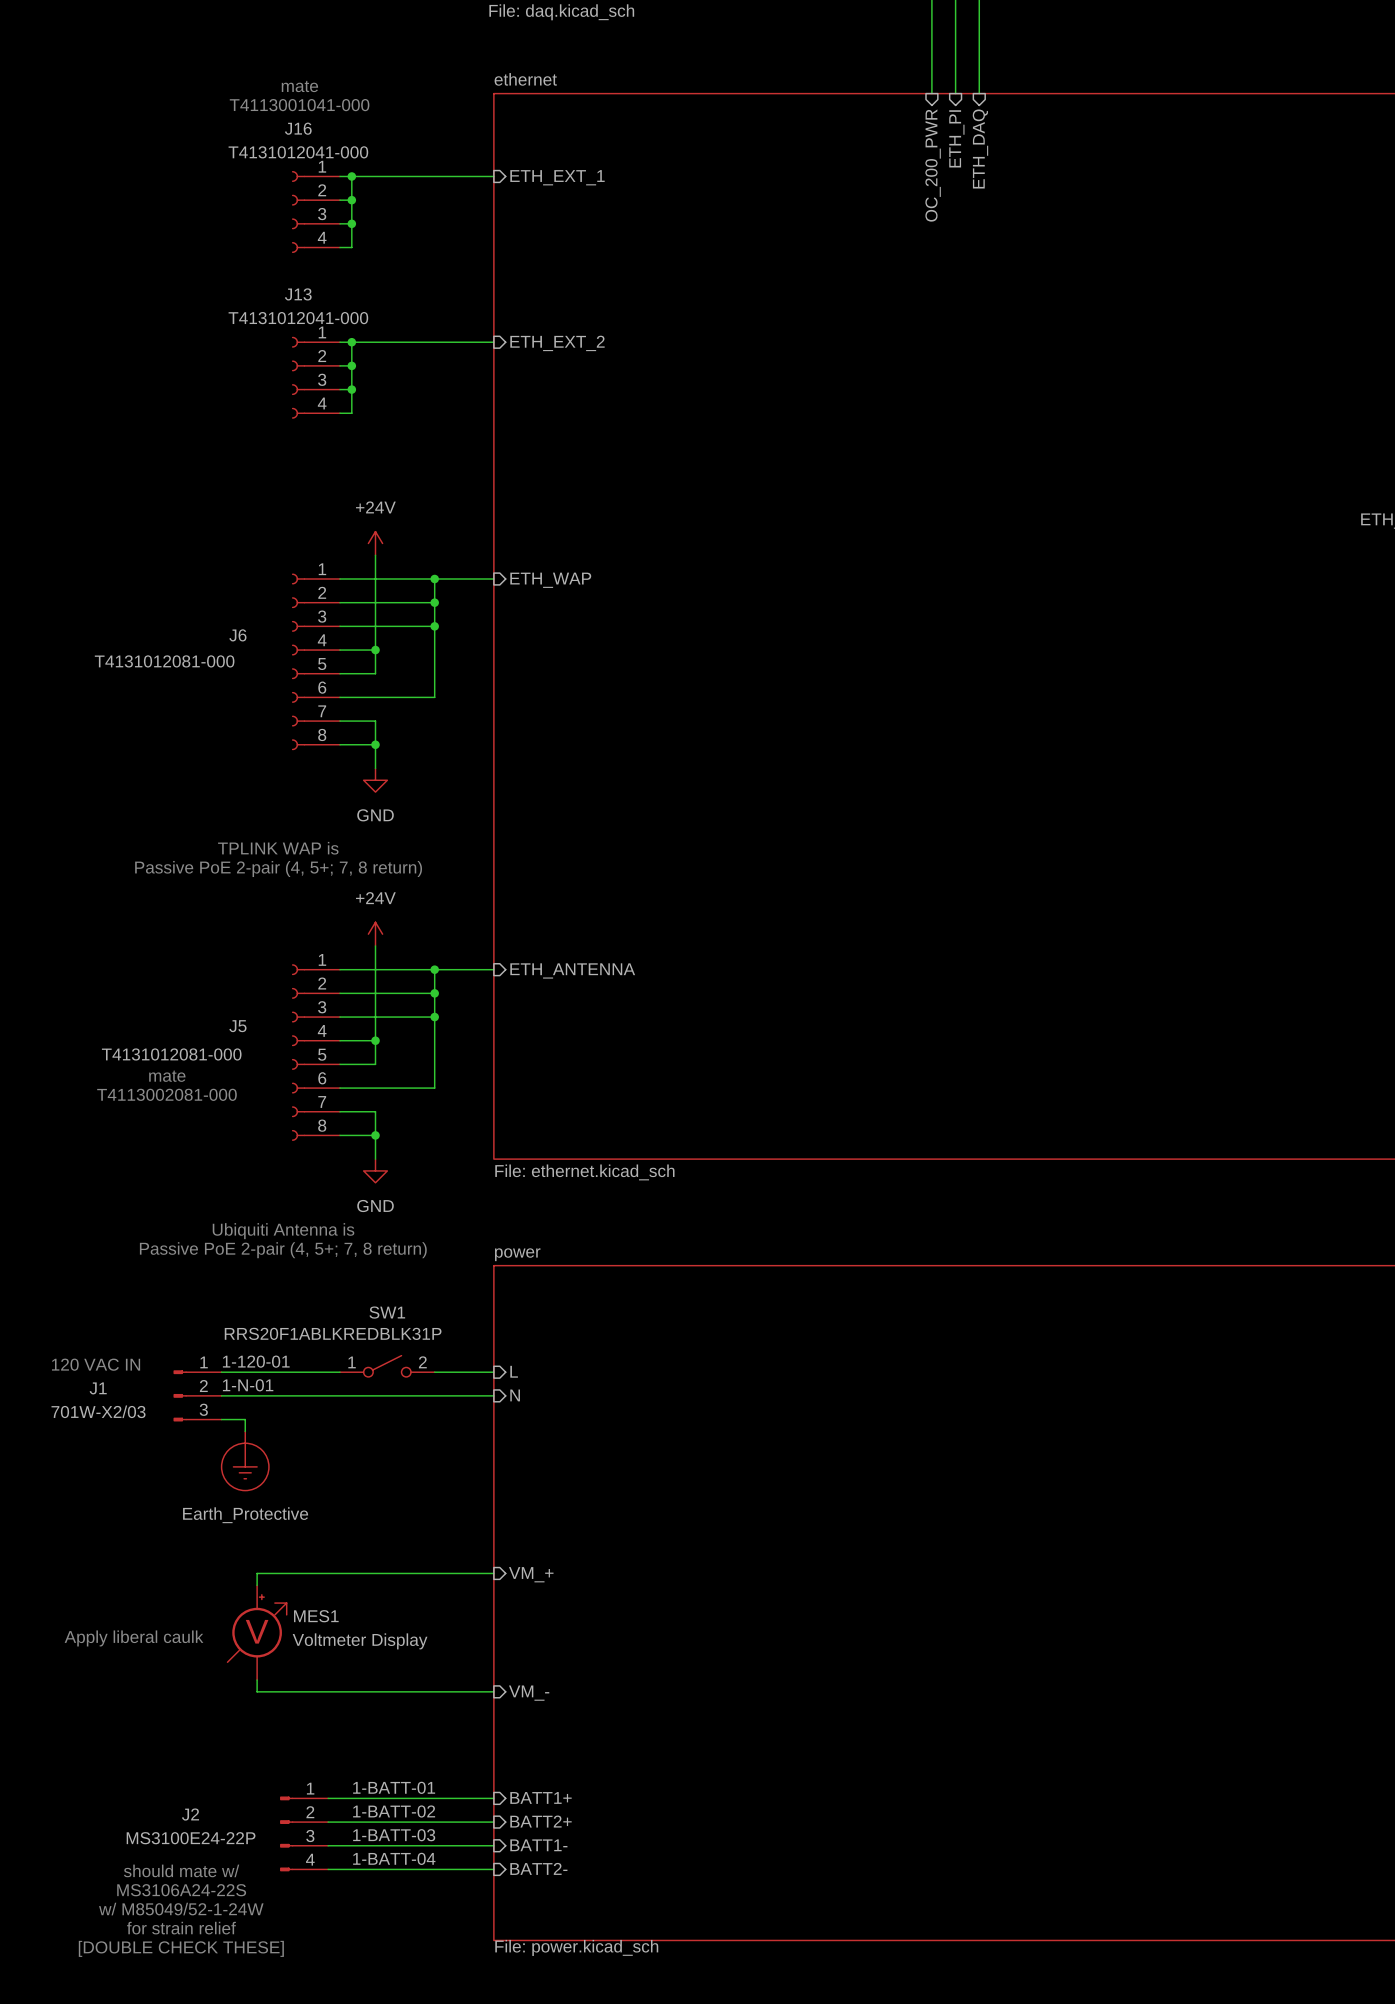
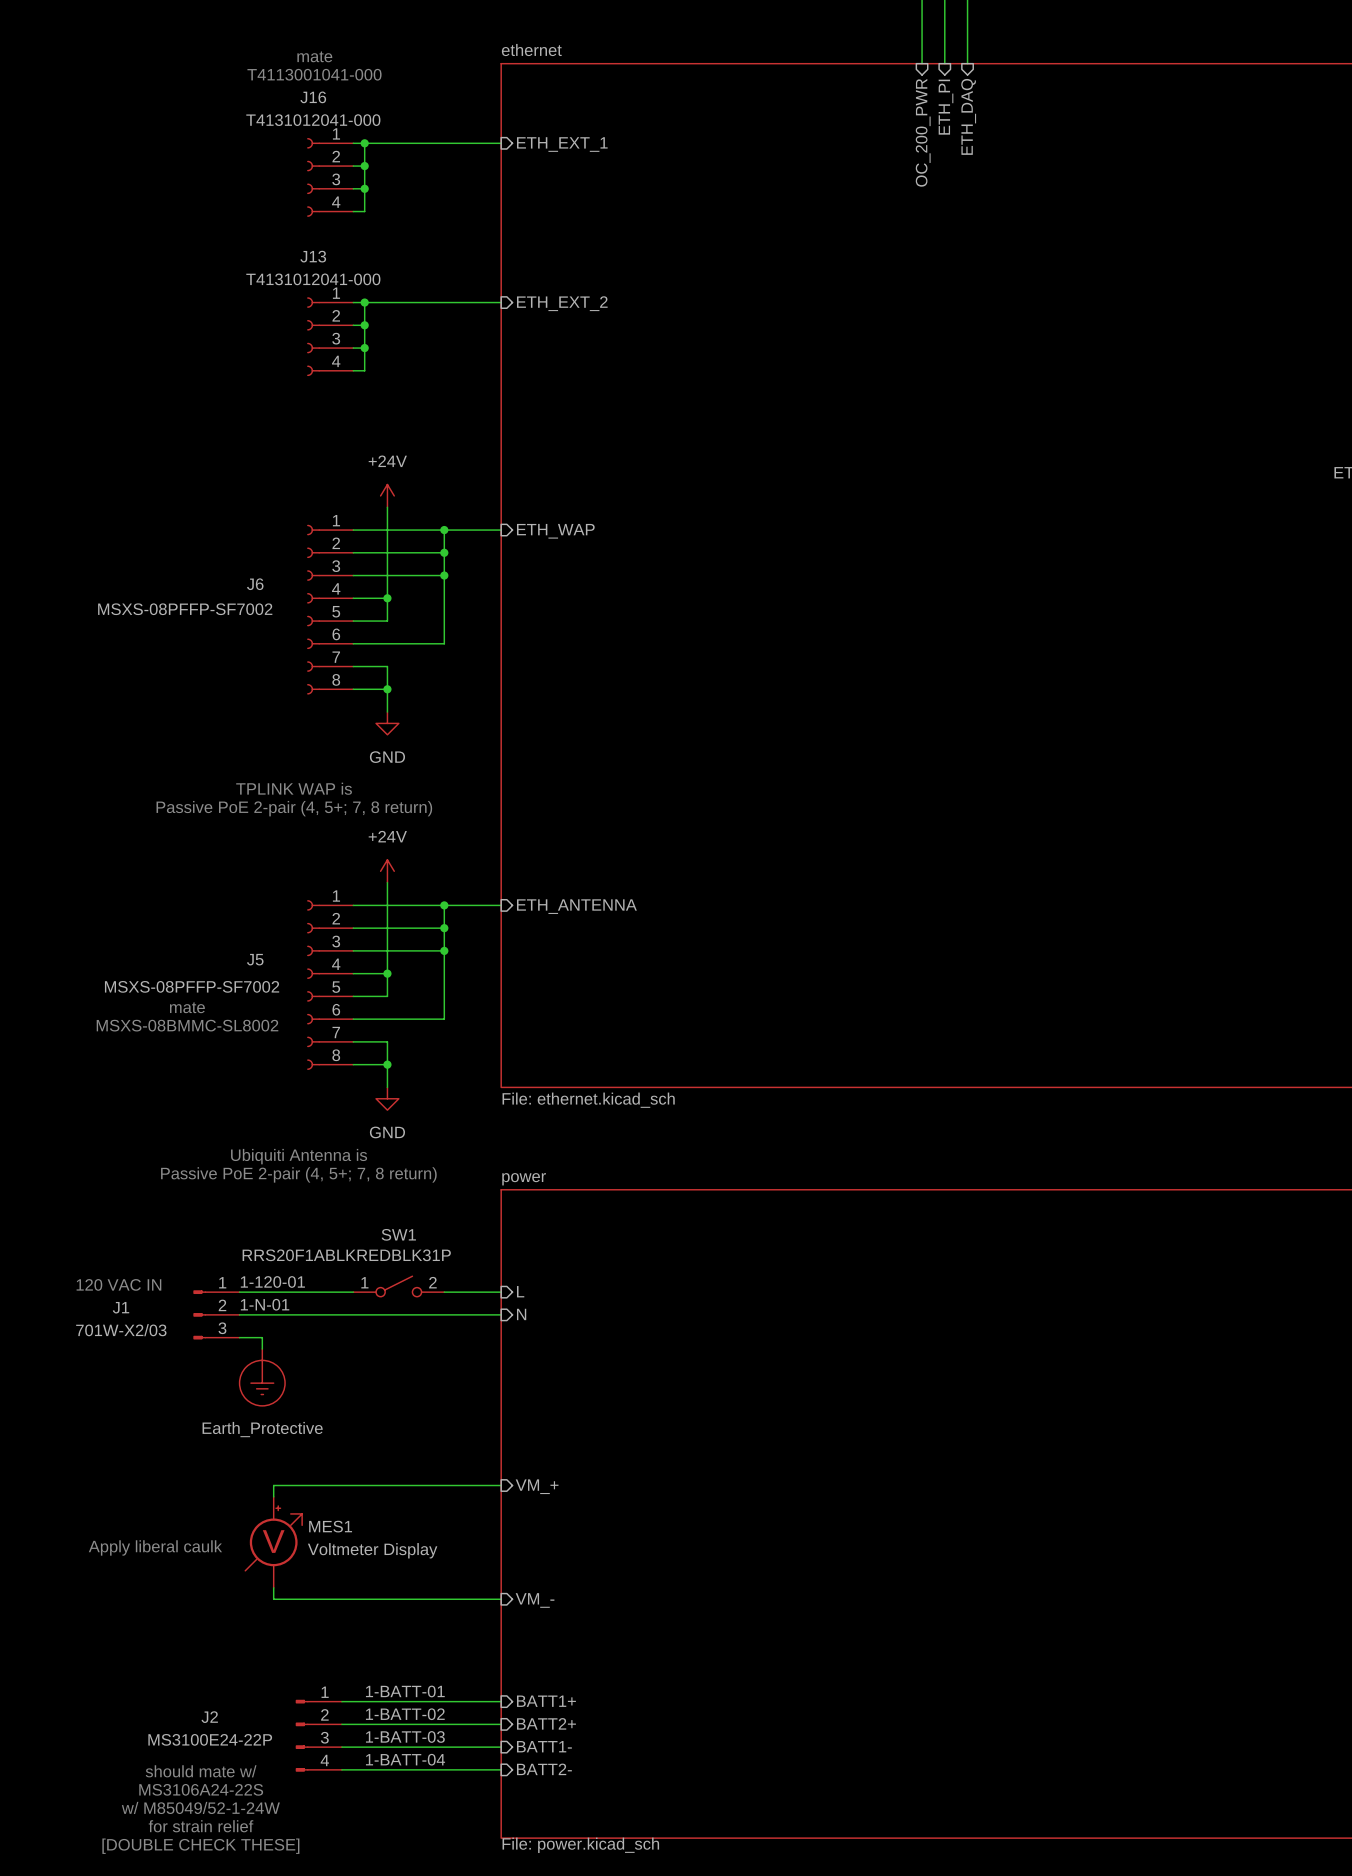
J6 value: T4131012081-000 (164, 661) -> MSXS-08PFFP-SF7002 (185, 609)
J5 value: T4131012081-000 (171, 1054) -> MSXS-08PFFP-SF7002 (192, 986)
text: T4113002081-000 (166, 1094) -> MSXS-08BMMC-SL8002 (187, 1025)

